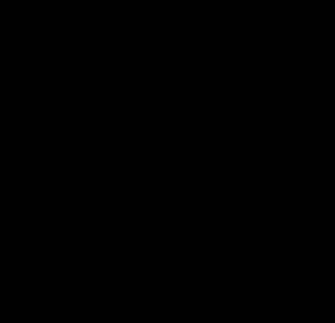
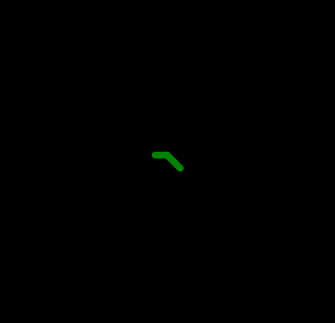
track: none -> (155, 155) (167, 155) (180, 168)

